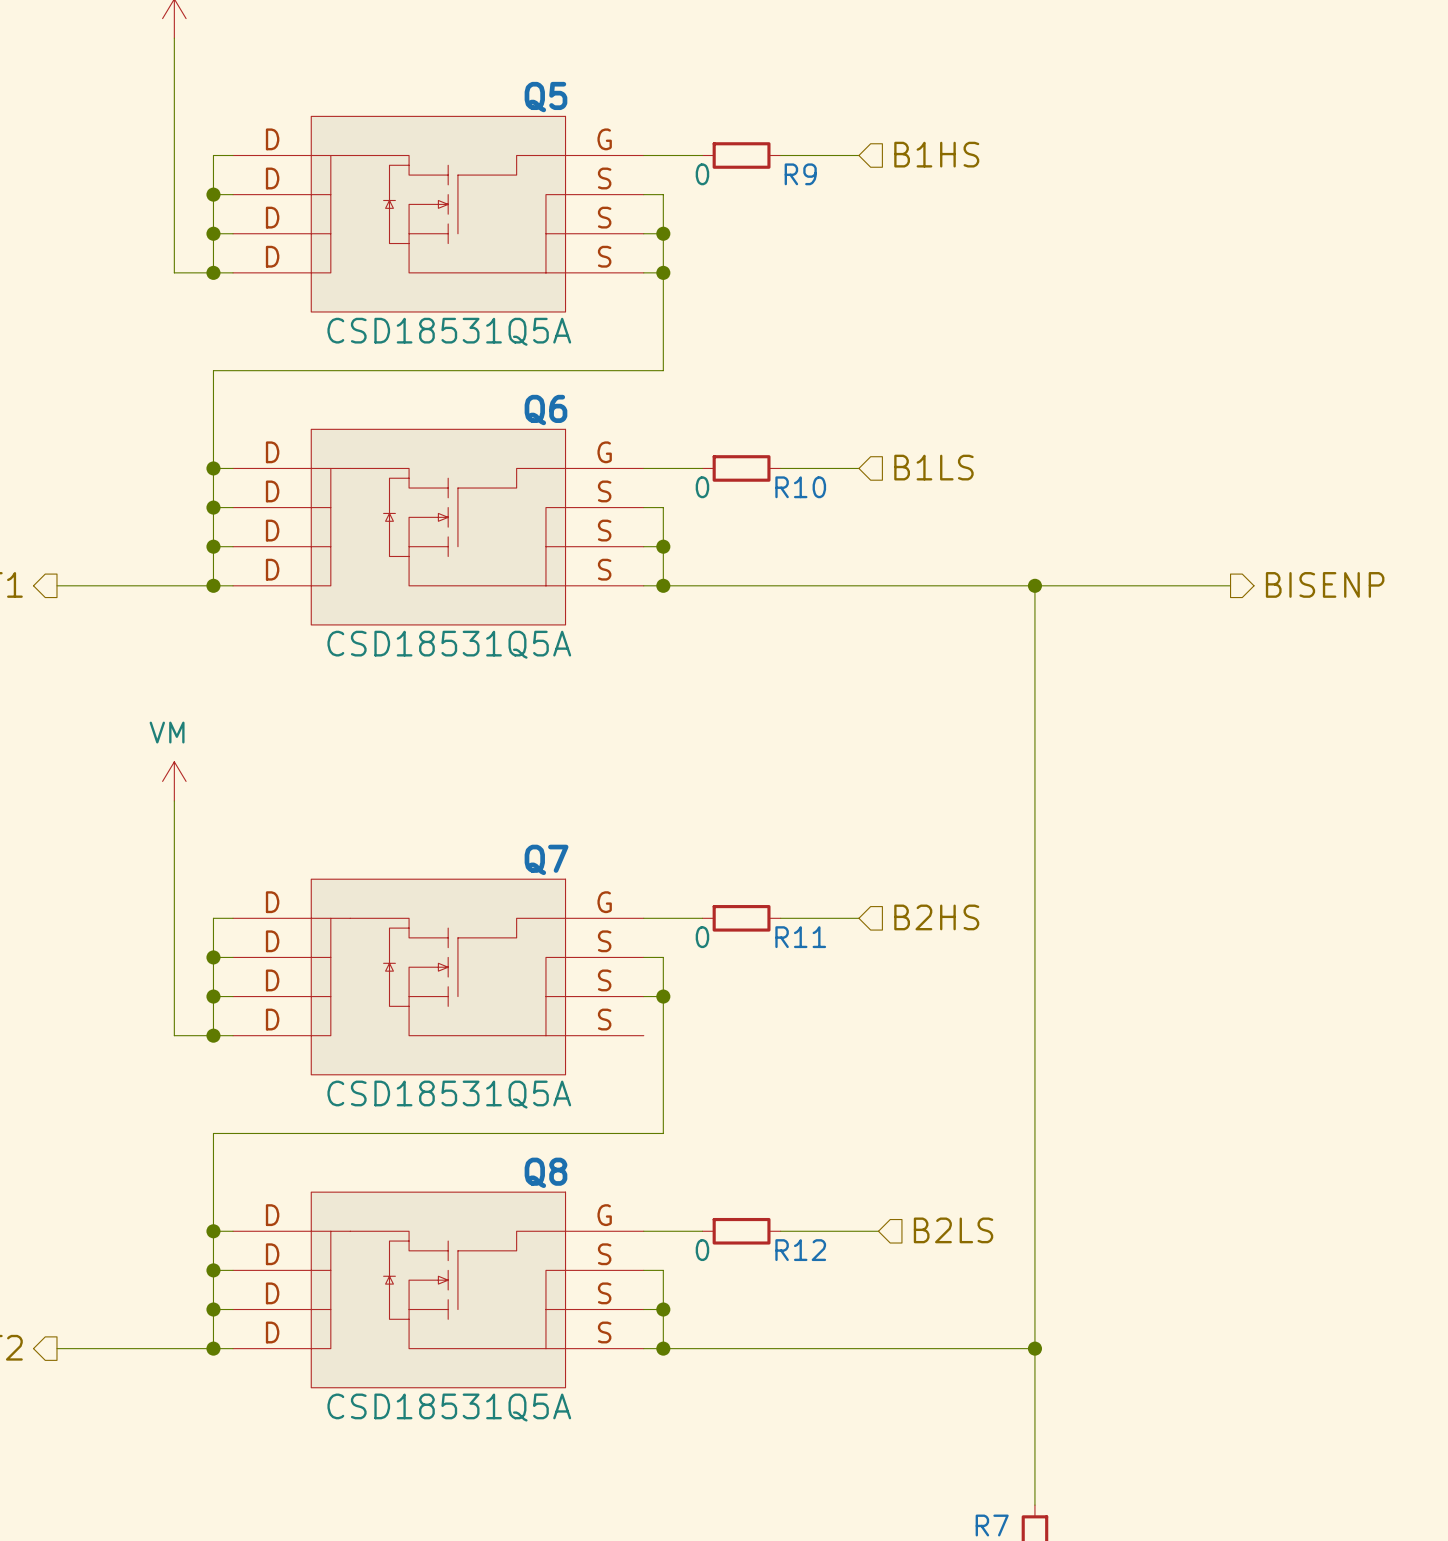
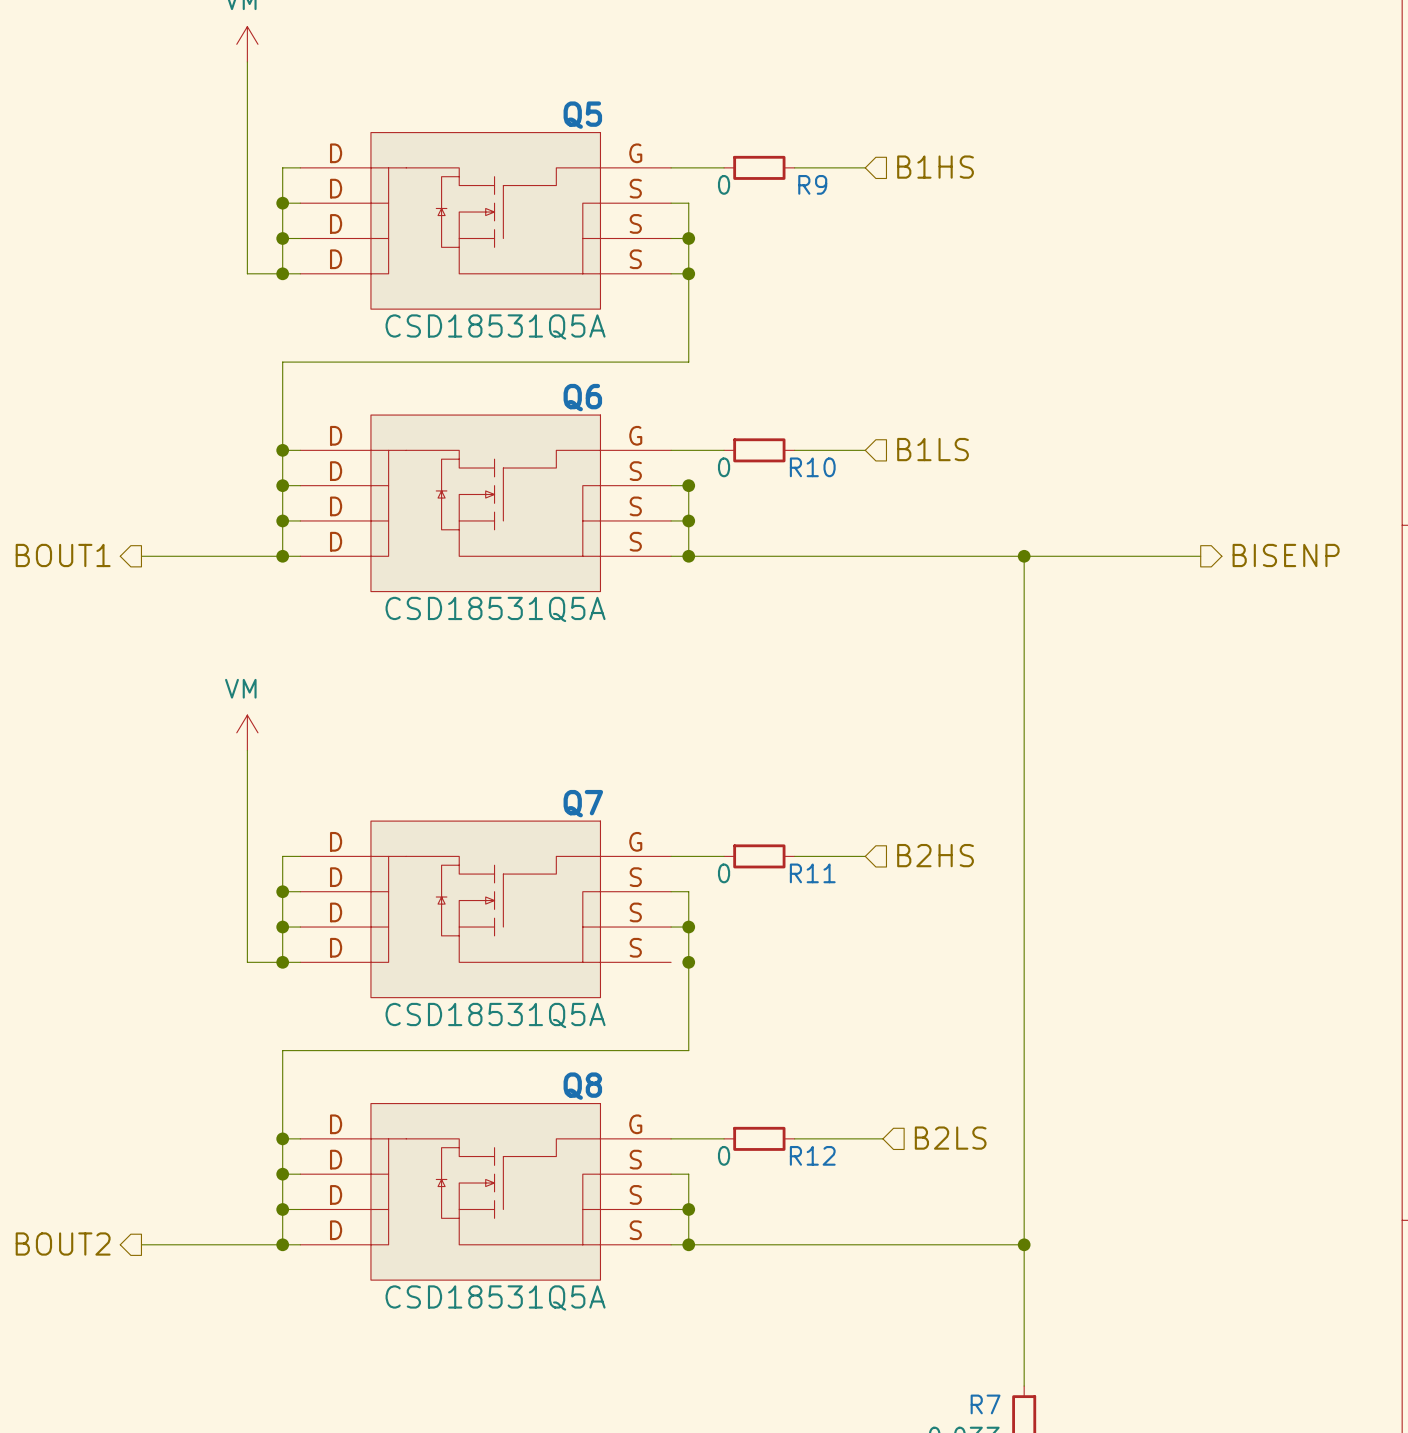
junction: none -> (688, 485)
junction: none -> (688, 962)

